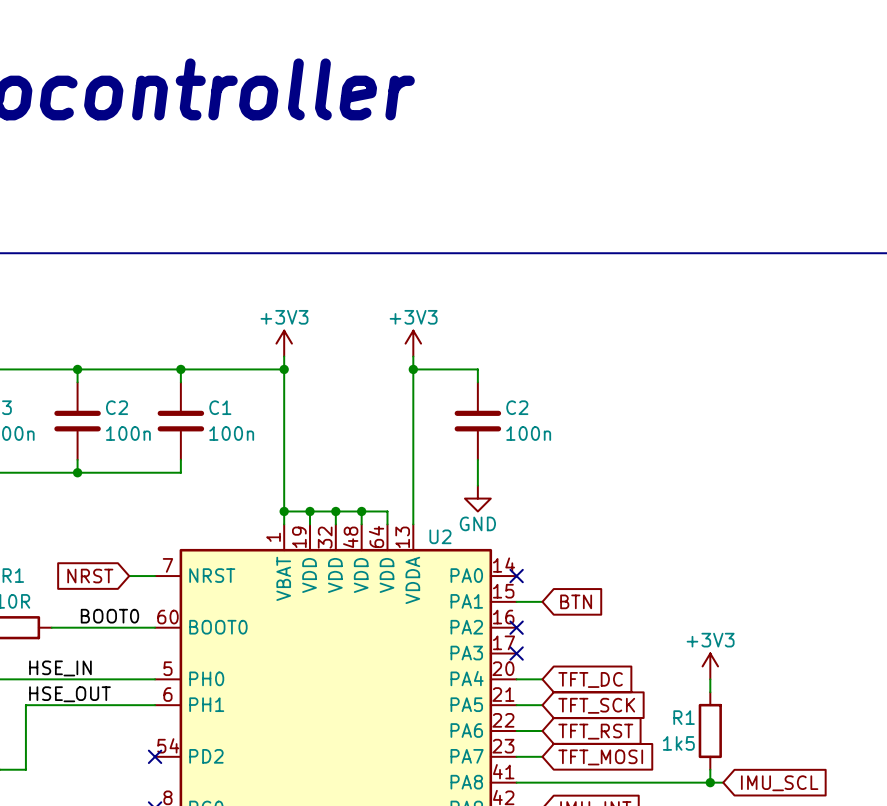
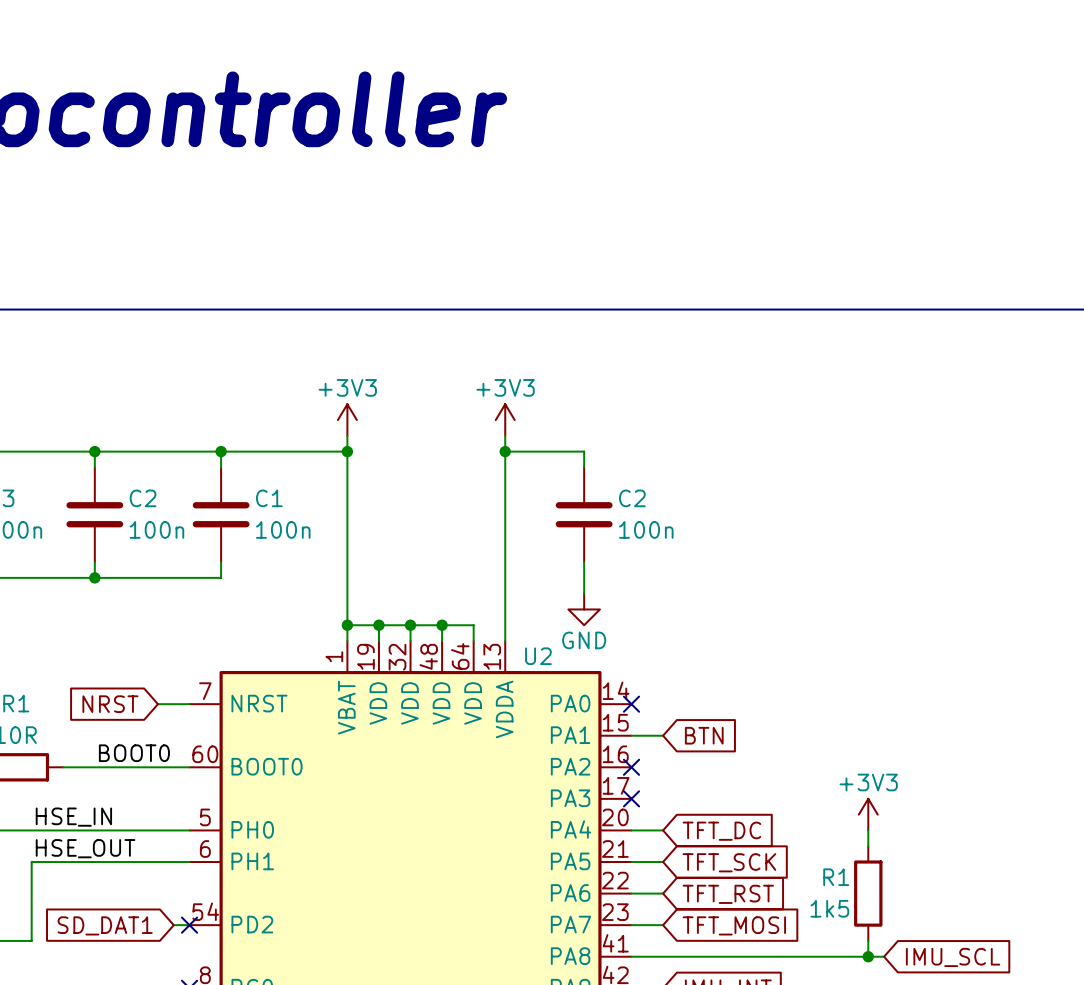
wire: none -> (173, 925) (189, 925)
global label: none -> SD_DAT1 (105, 925)

